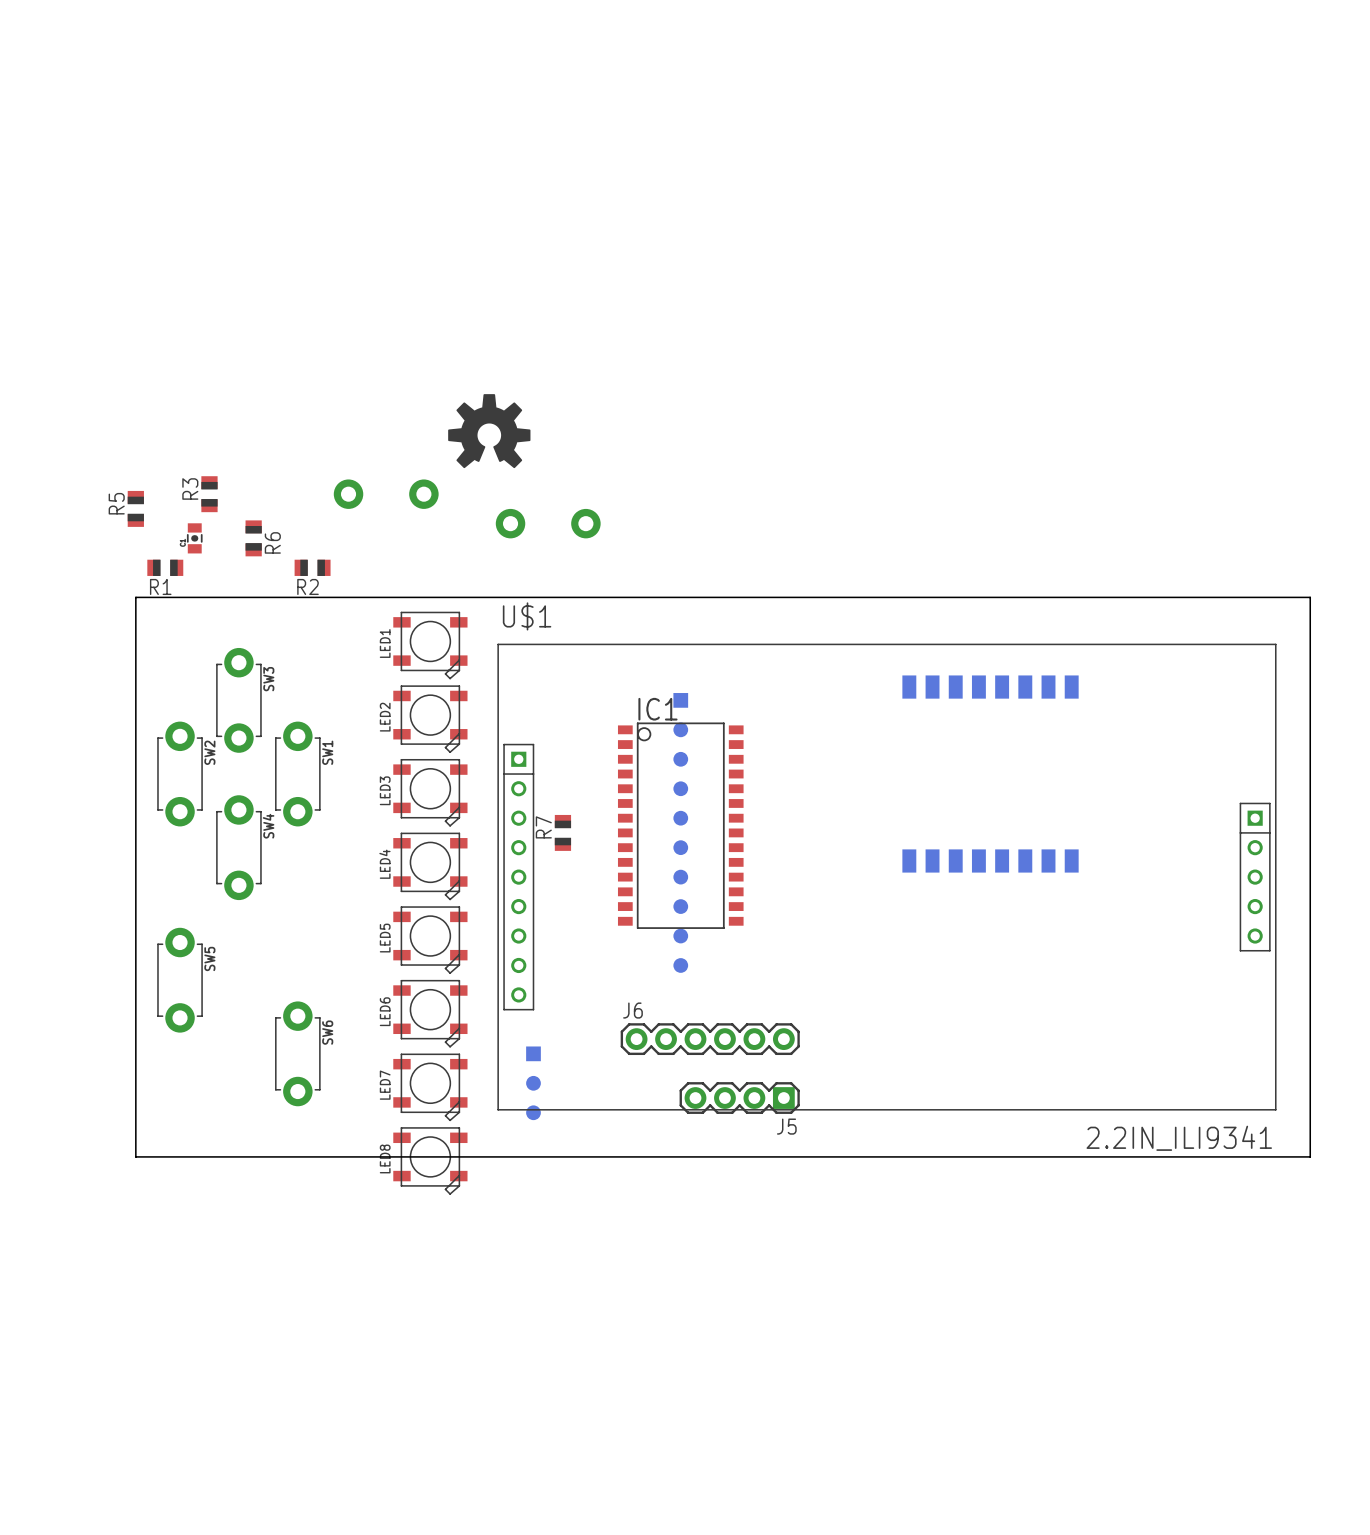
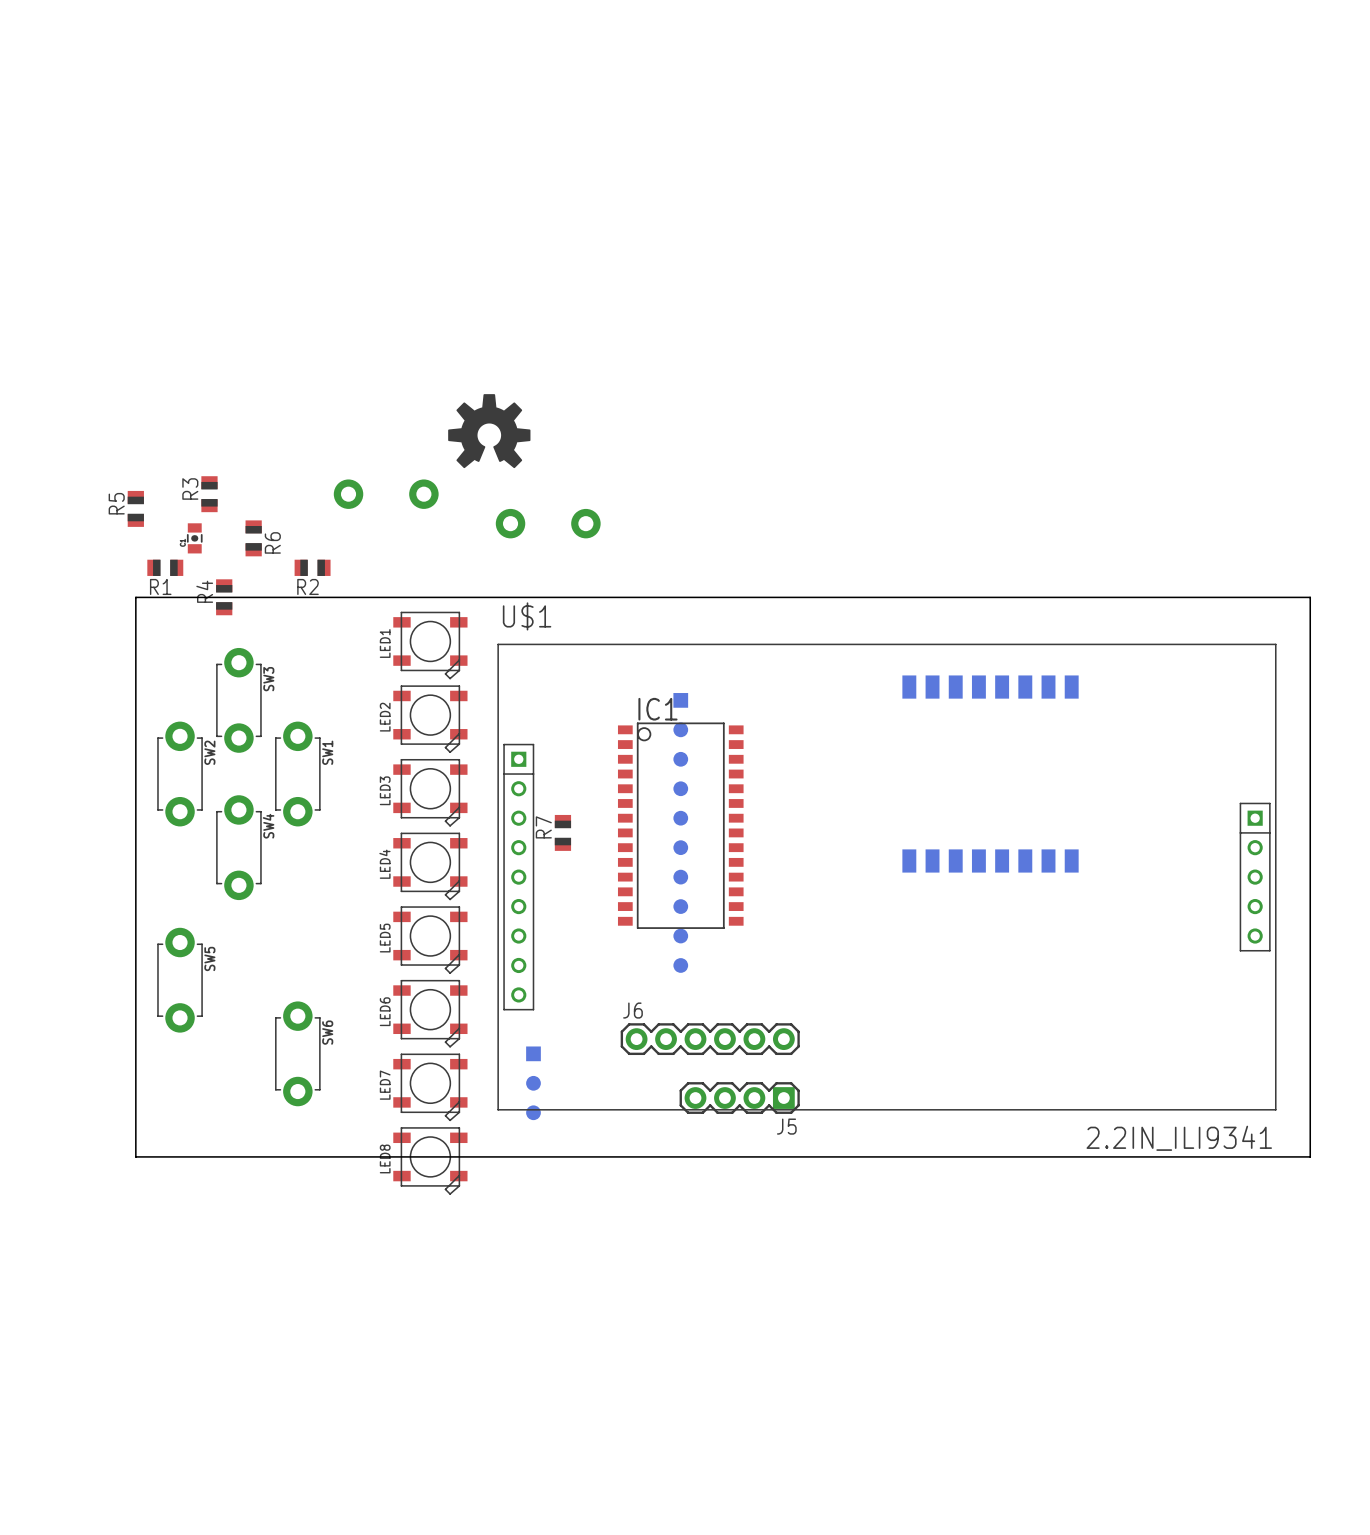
R4: none -> (224, 597)

